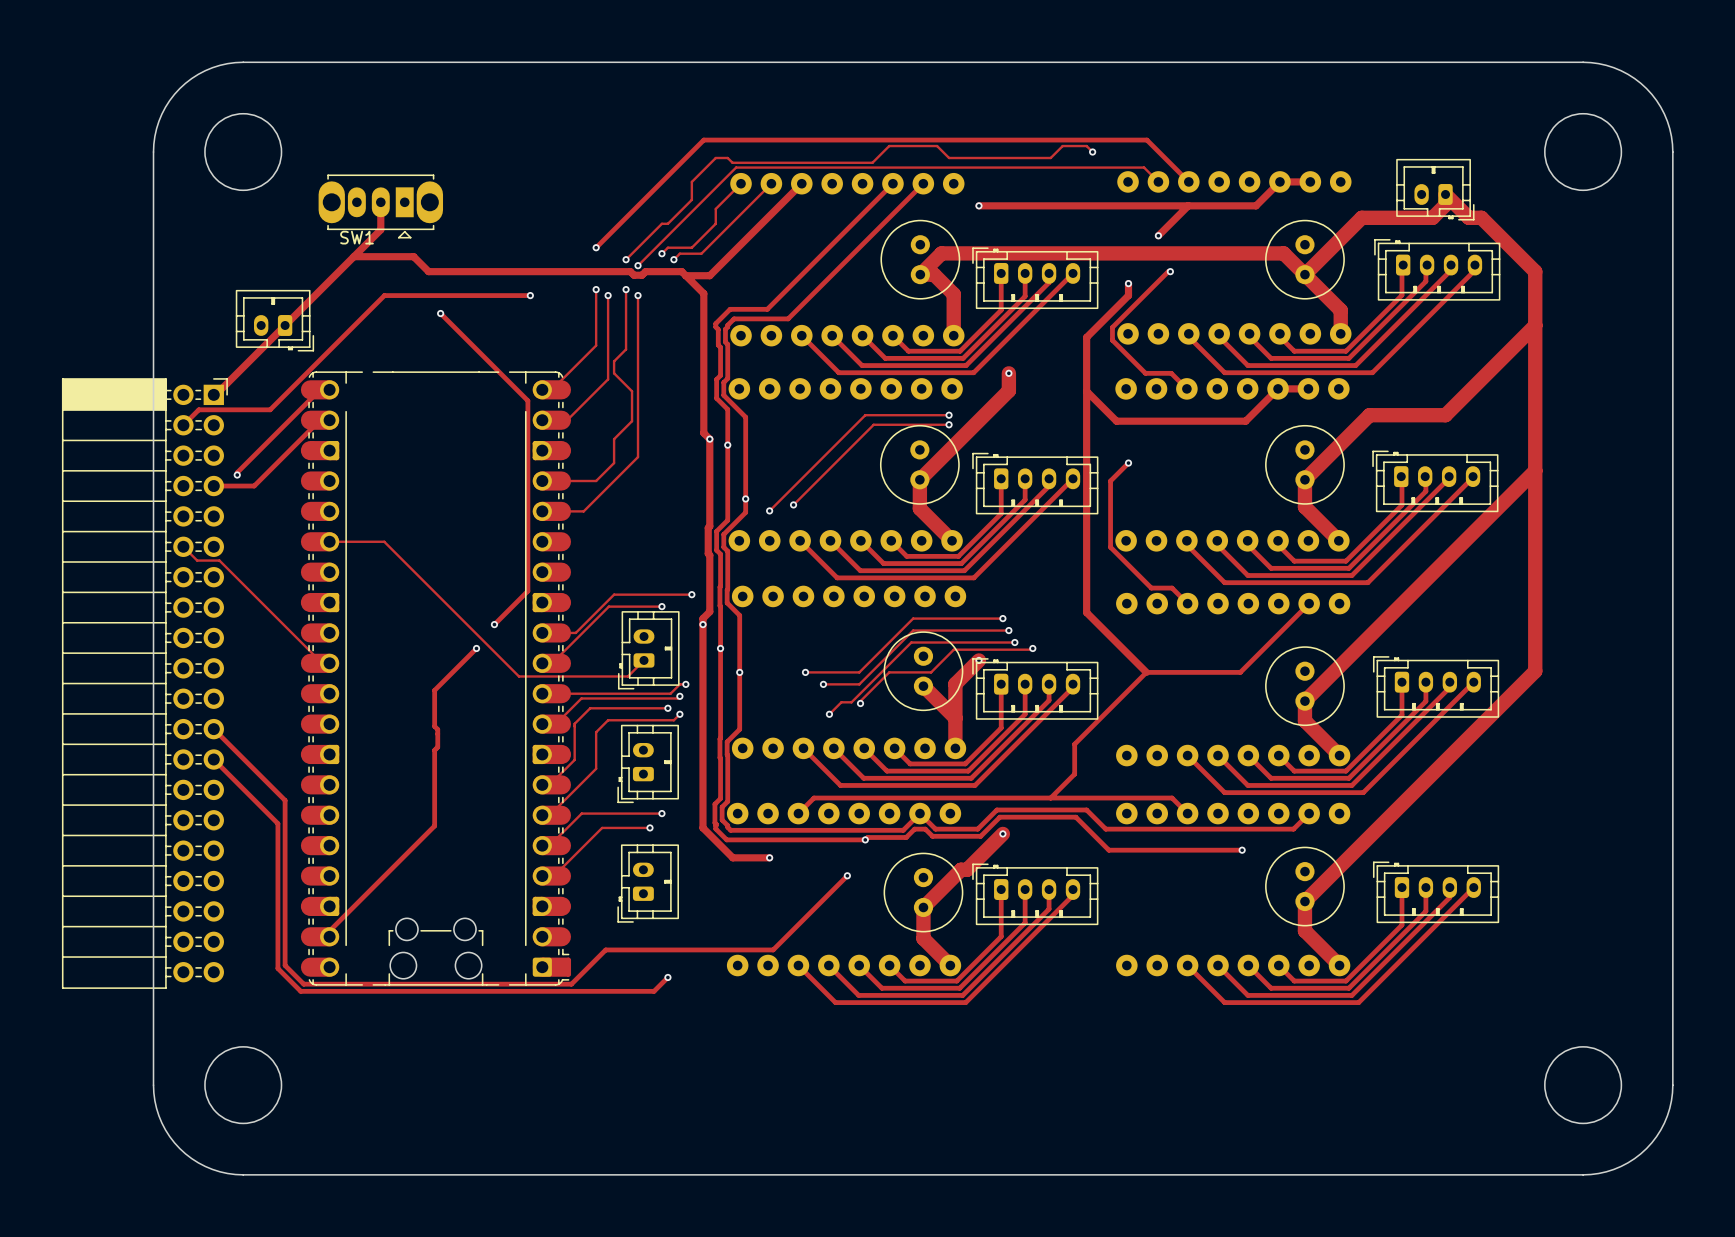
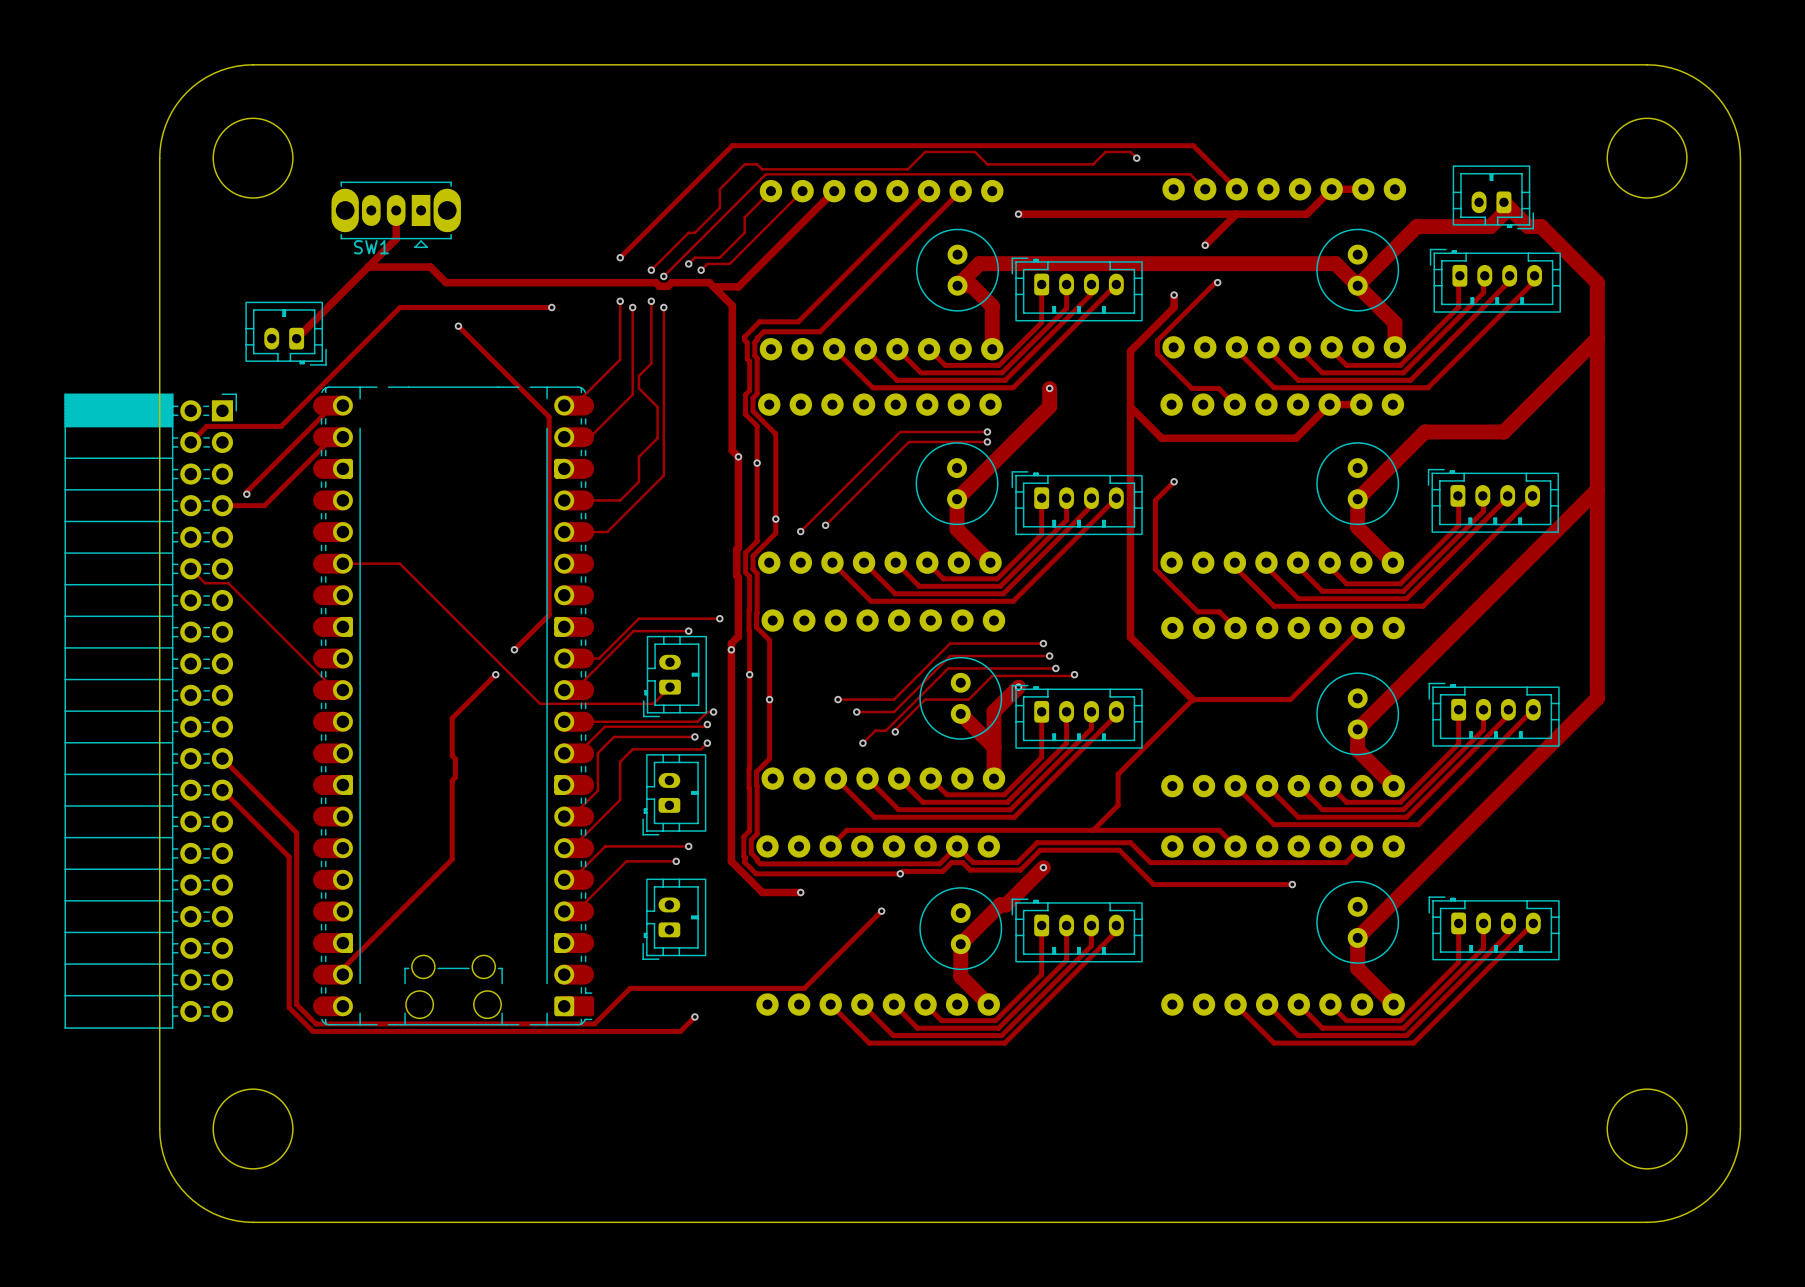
track: (285, 325) (213, 394) -> none

